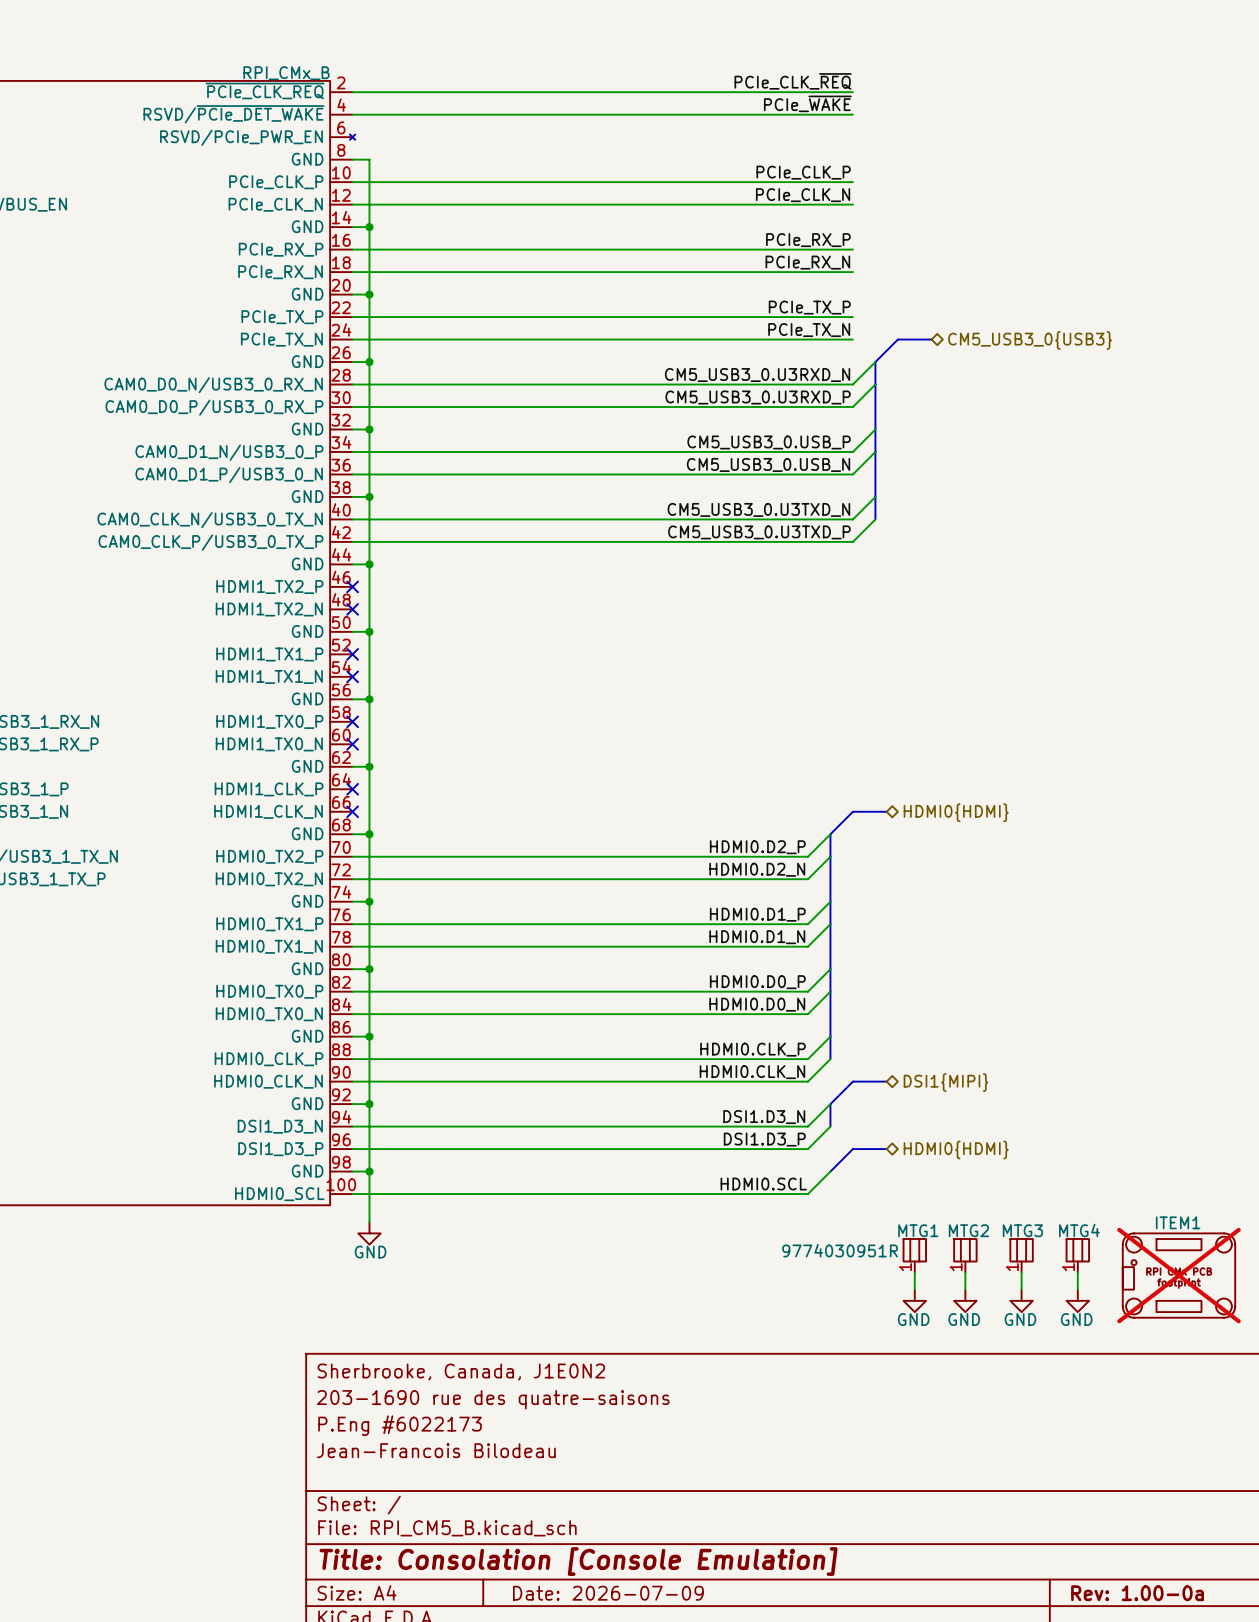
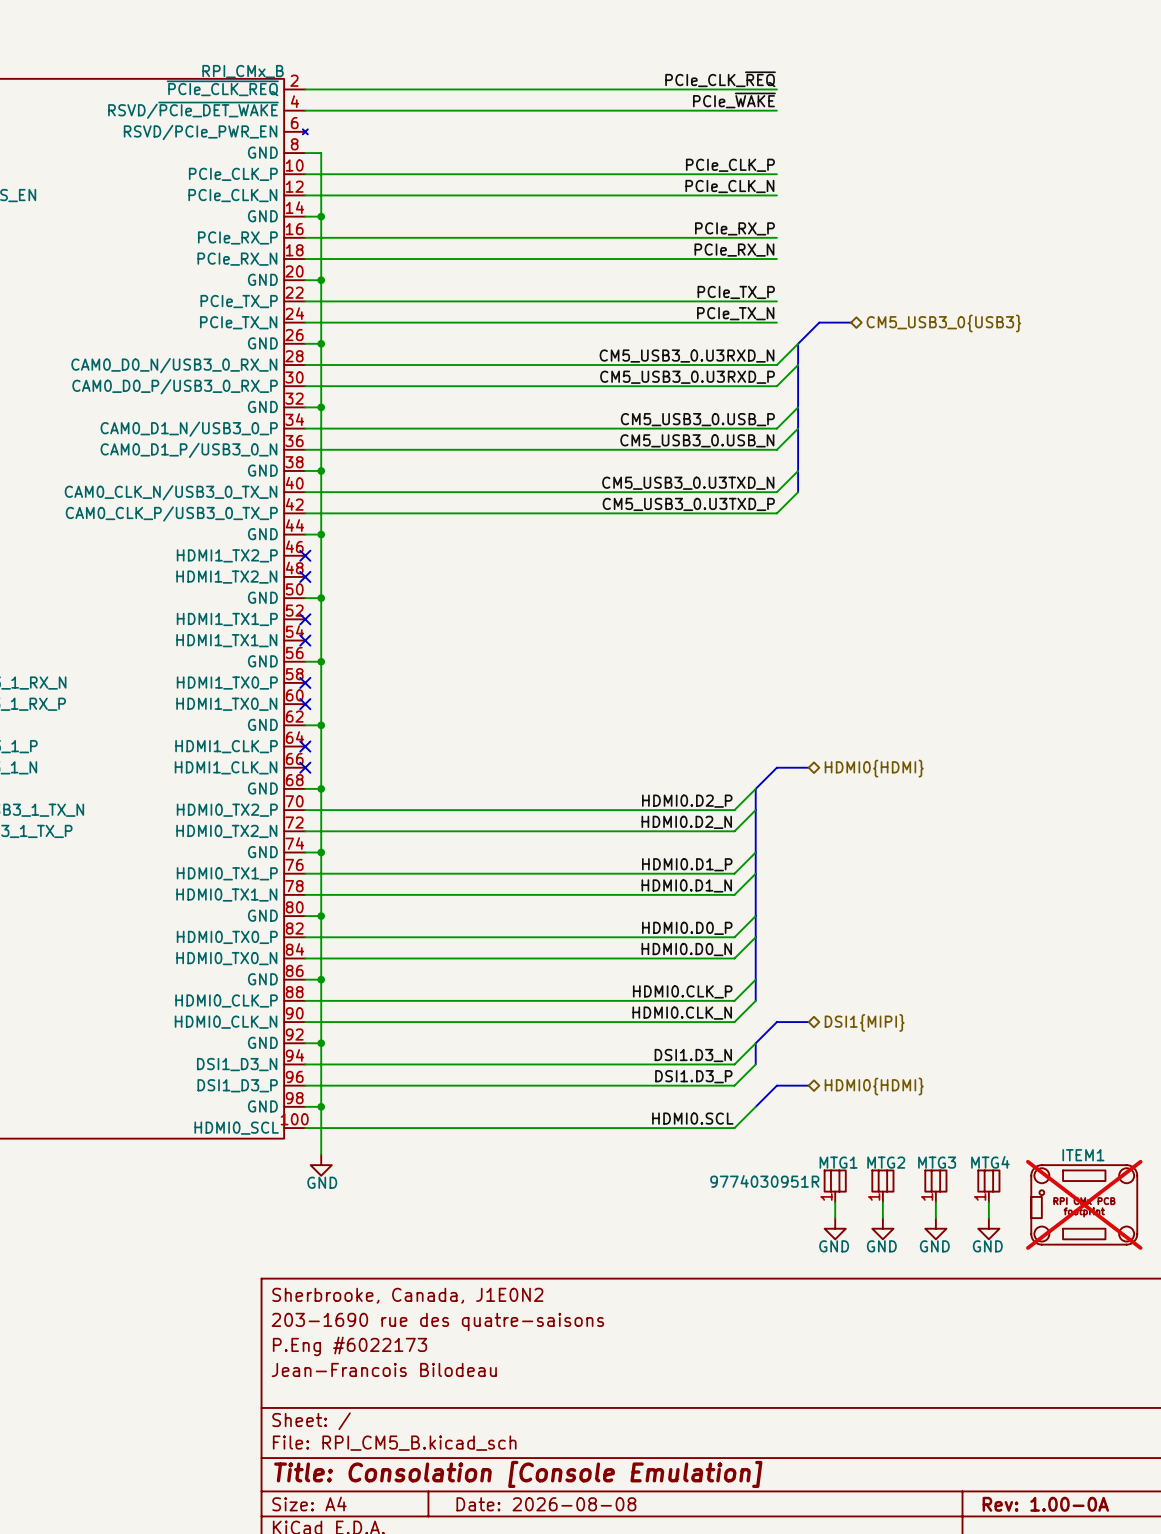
title block: Date: 2026-07-09 (608, 1593) -> Date: 2026-08-08 (546, 1504)
title block: Rev: 1.00-0a (1137, 1593) -> Rev: 1.00-0A (1045, 1504)

